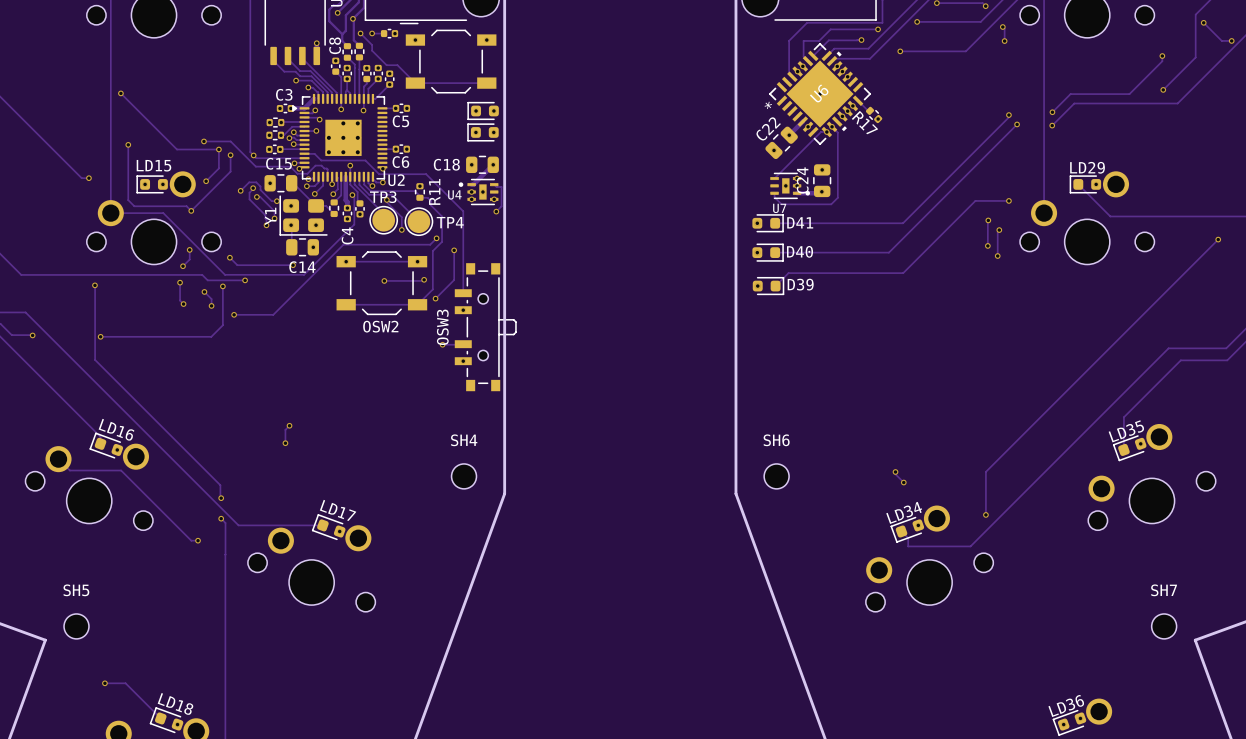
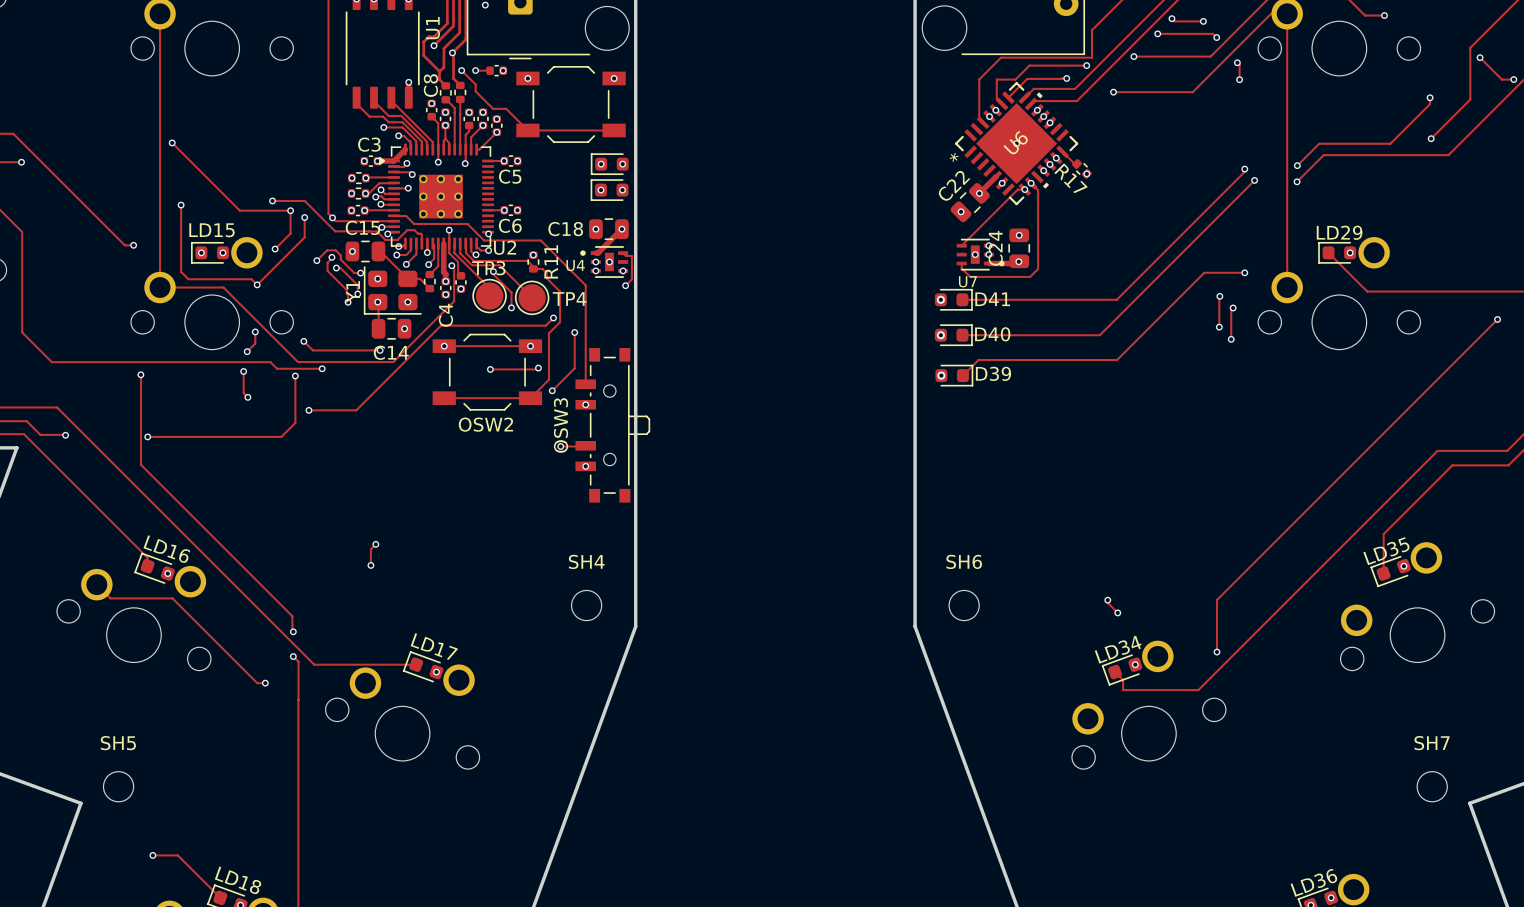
part: none -> (423, 179)
track: (204, 291) (211, 299) (211, 305) -> none
via: (204, 291) -> none
via: (211, 305) -> none

